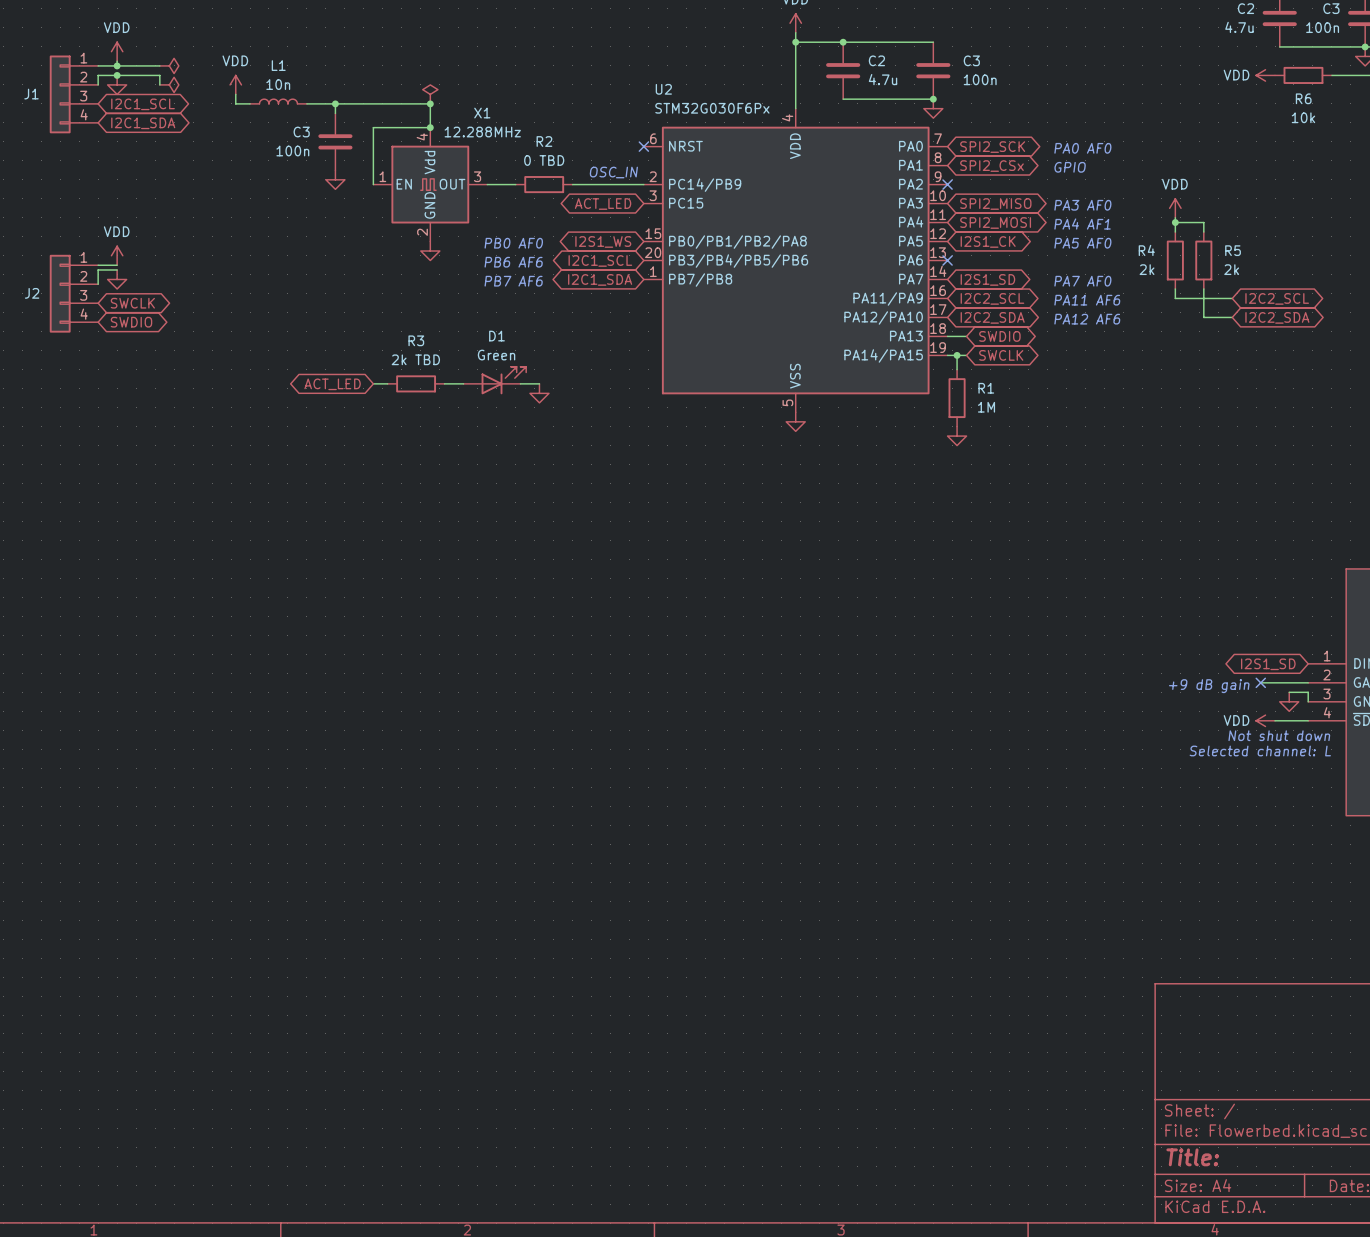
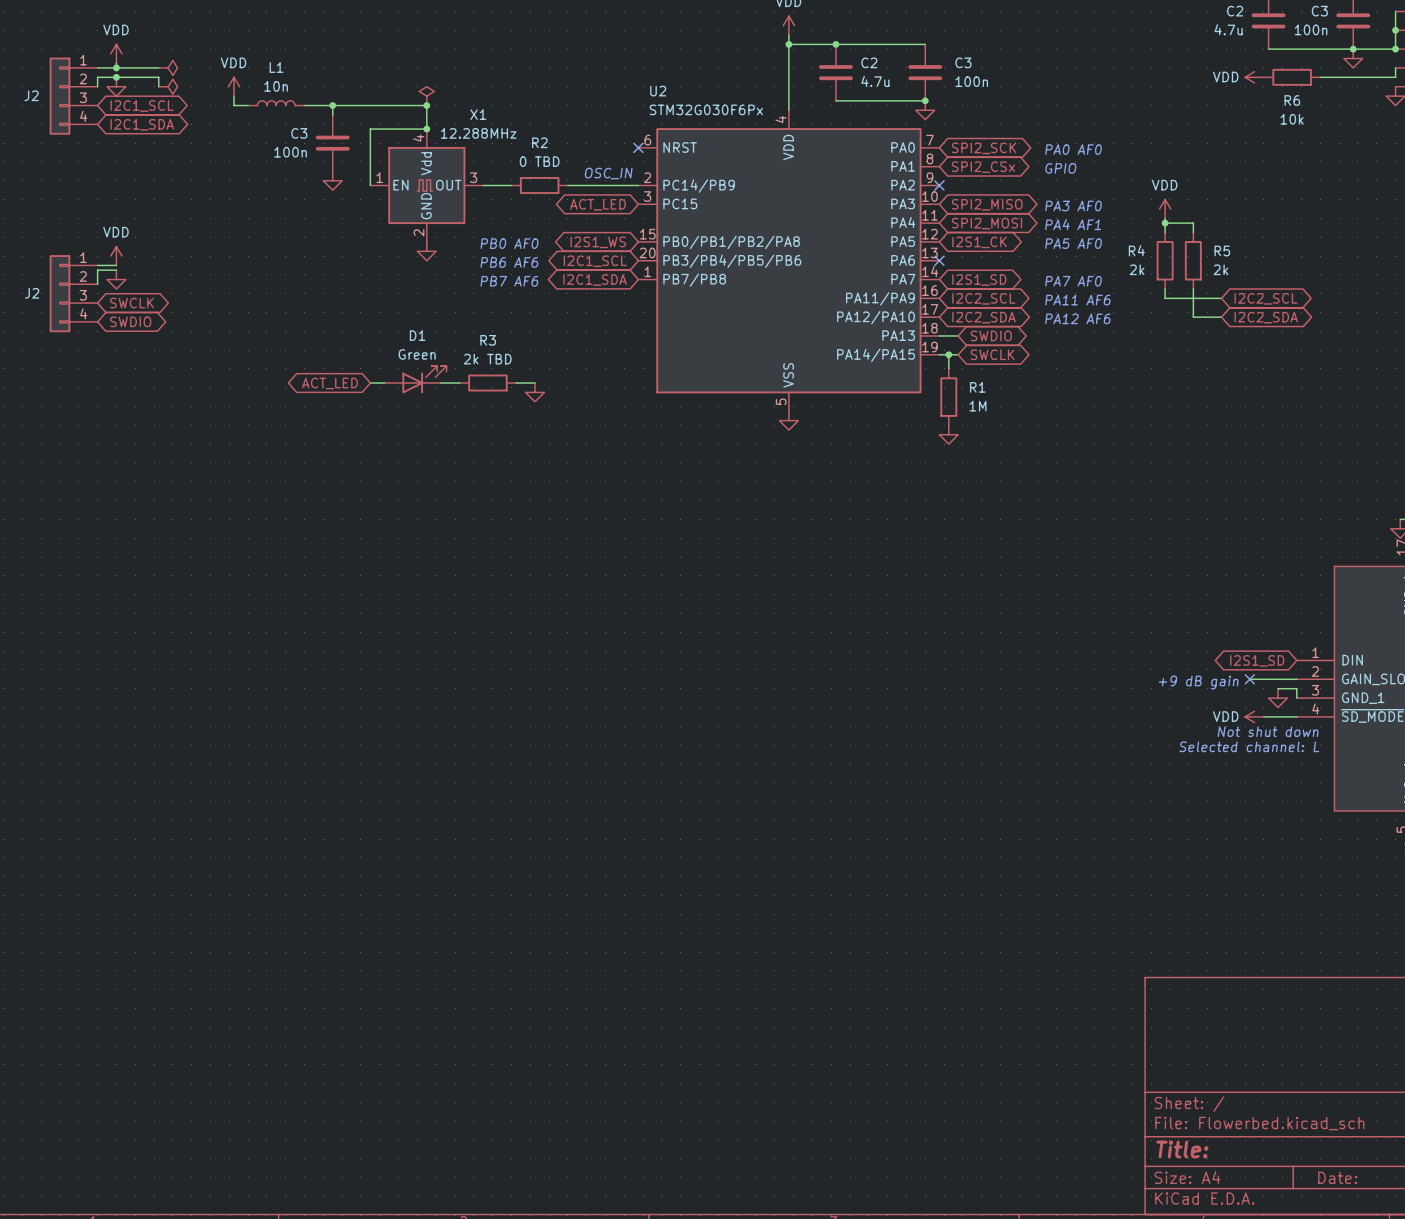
J1 name: J1 (31, 94) -> J2 (31, 95)
D1 position: (494, 380) -> (415, 379)
R3 position: (416, 383) -> (487, 383)

